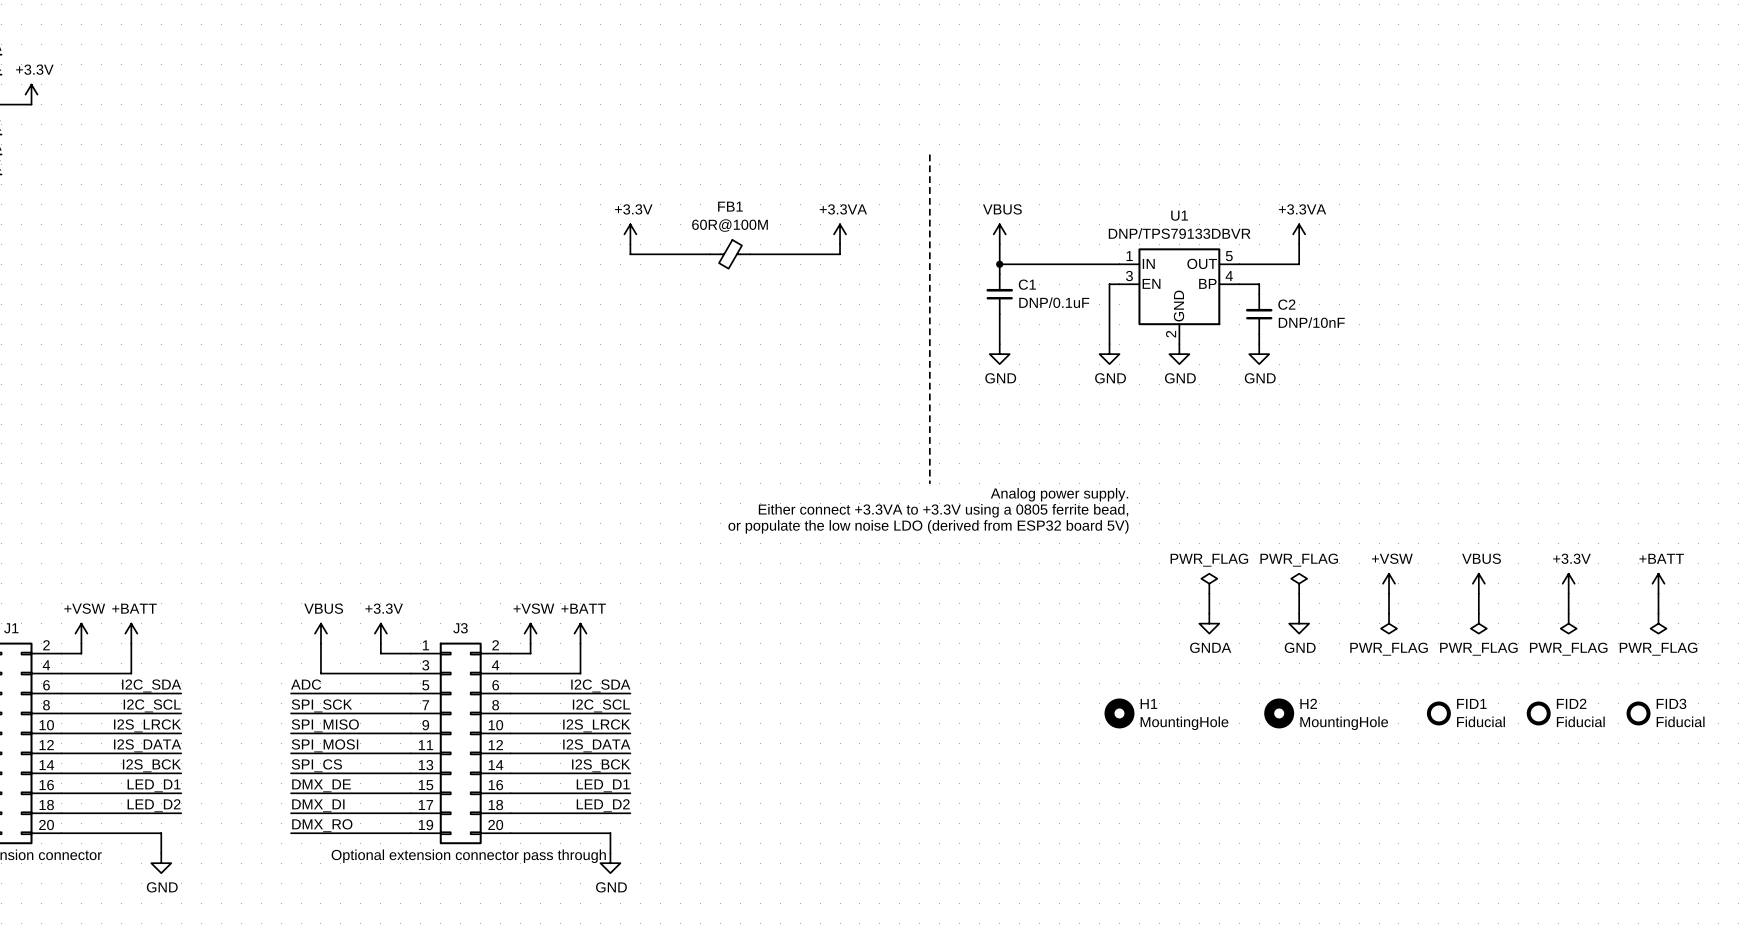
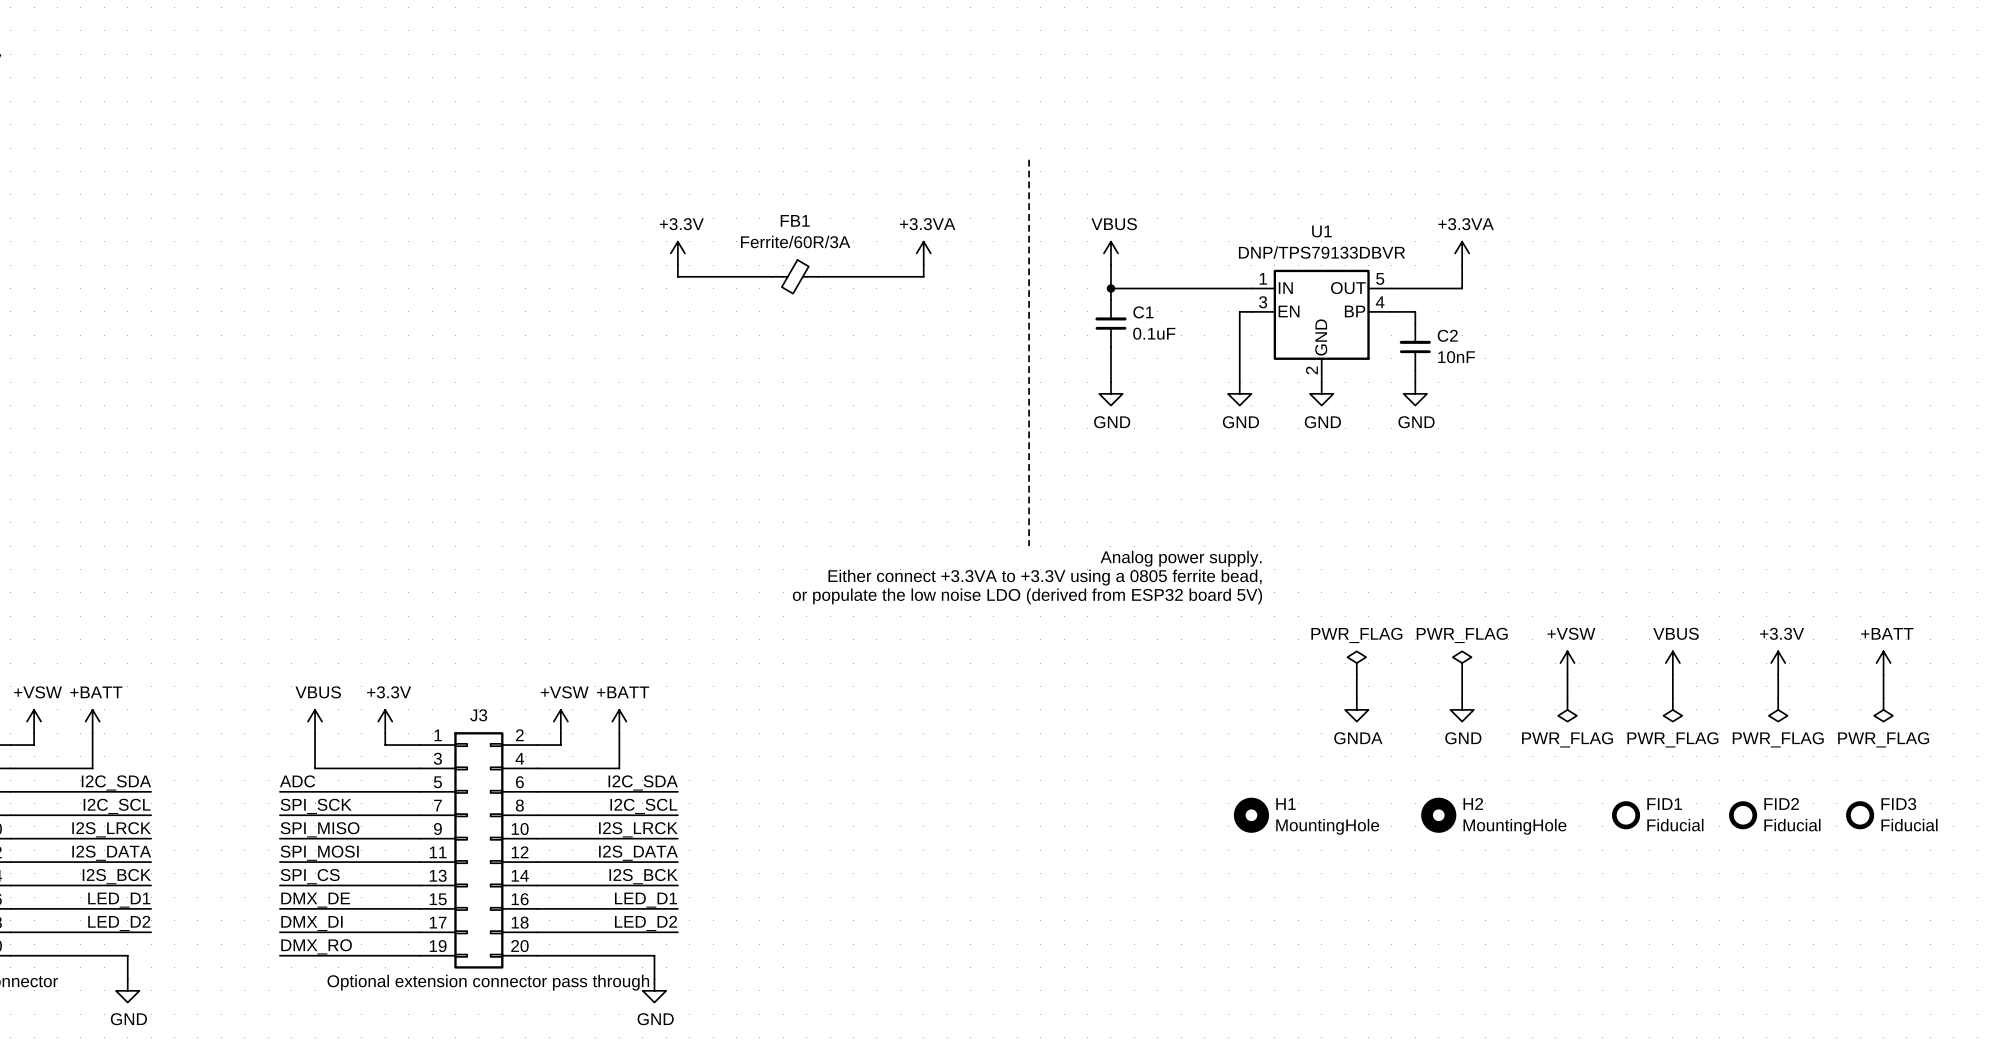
FB1 value: 60R@100M (729, 225) -> Ferrite/60R/3A (795, 241)
C1 value: DNP/0.1uF (1054, 302) -> 0.1uF (1154, 333)
C2 value: DNP/10nF (1311, 322) -> 10nF (1456, 357)

